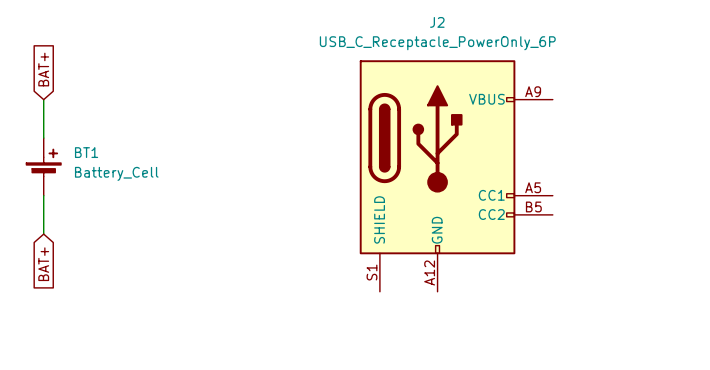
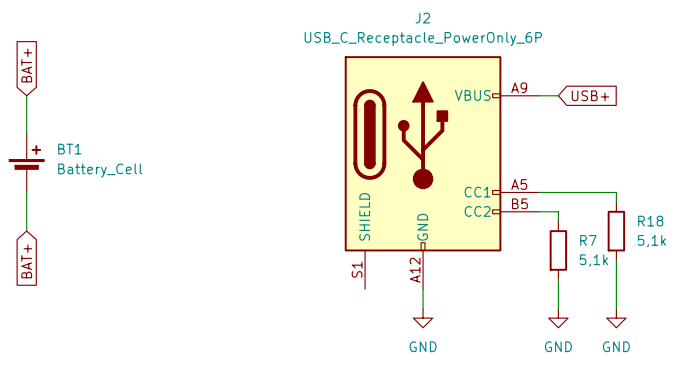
wire: none -> (539, 95) (558, 95)
global label: none -> USB+ (590, 95)
wire: none -> (539, 192) (616, 192) (616, 202)
wire: none -> (539, 211) (558, 211) (558, 221)
R18: none -> 5,1k (616, 231)
R7: none -> 5,1k (558, 250)
wire: none -> (616, 260) (616, 308)
wire: none -> (558, 279) (558, 308)
wire: none -> (423, 289) (423, 308)
power symbol: none -> GND (423, 318)
power symbol: none -> GND (558, 318)
power symbol: none -> GND (616, 318)

